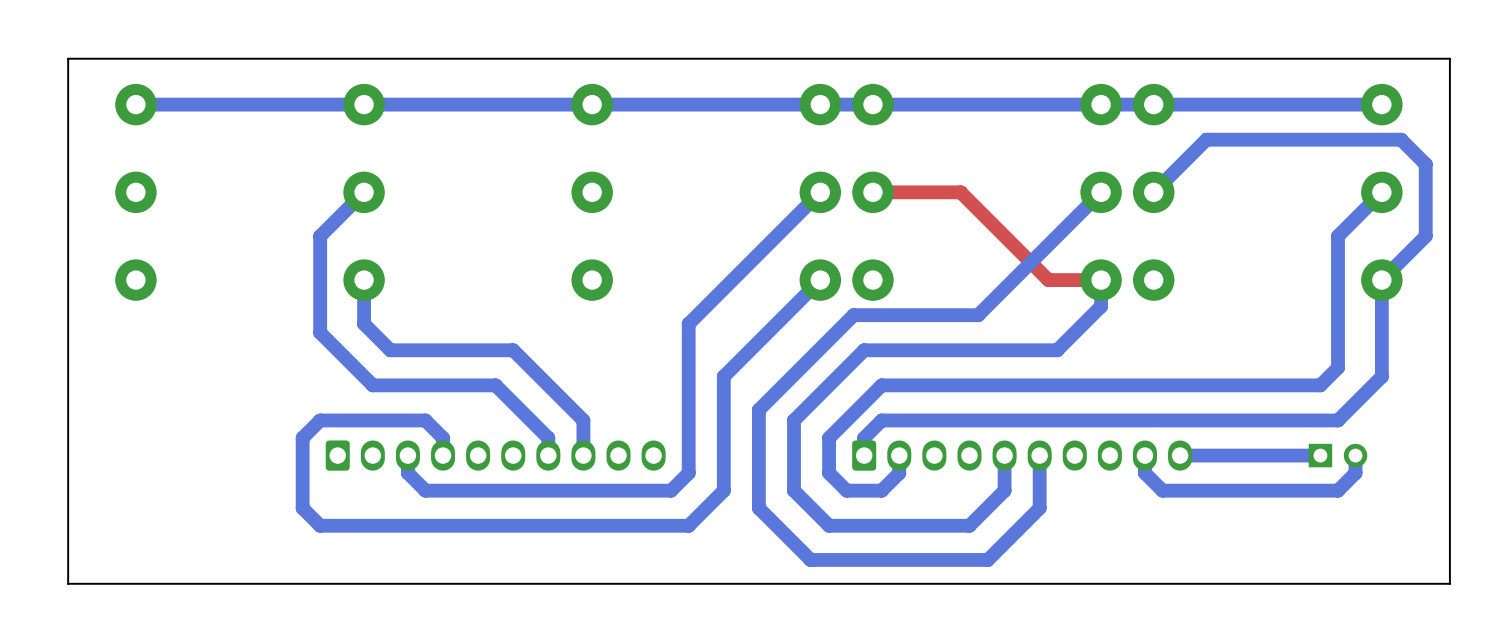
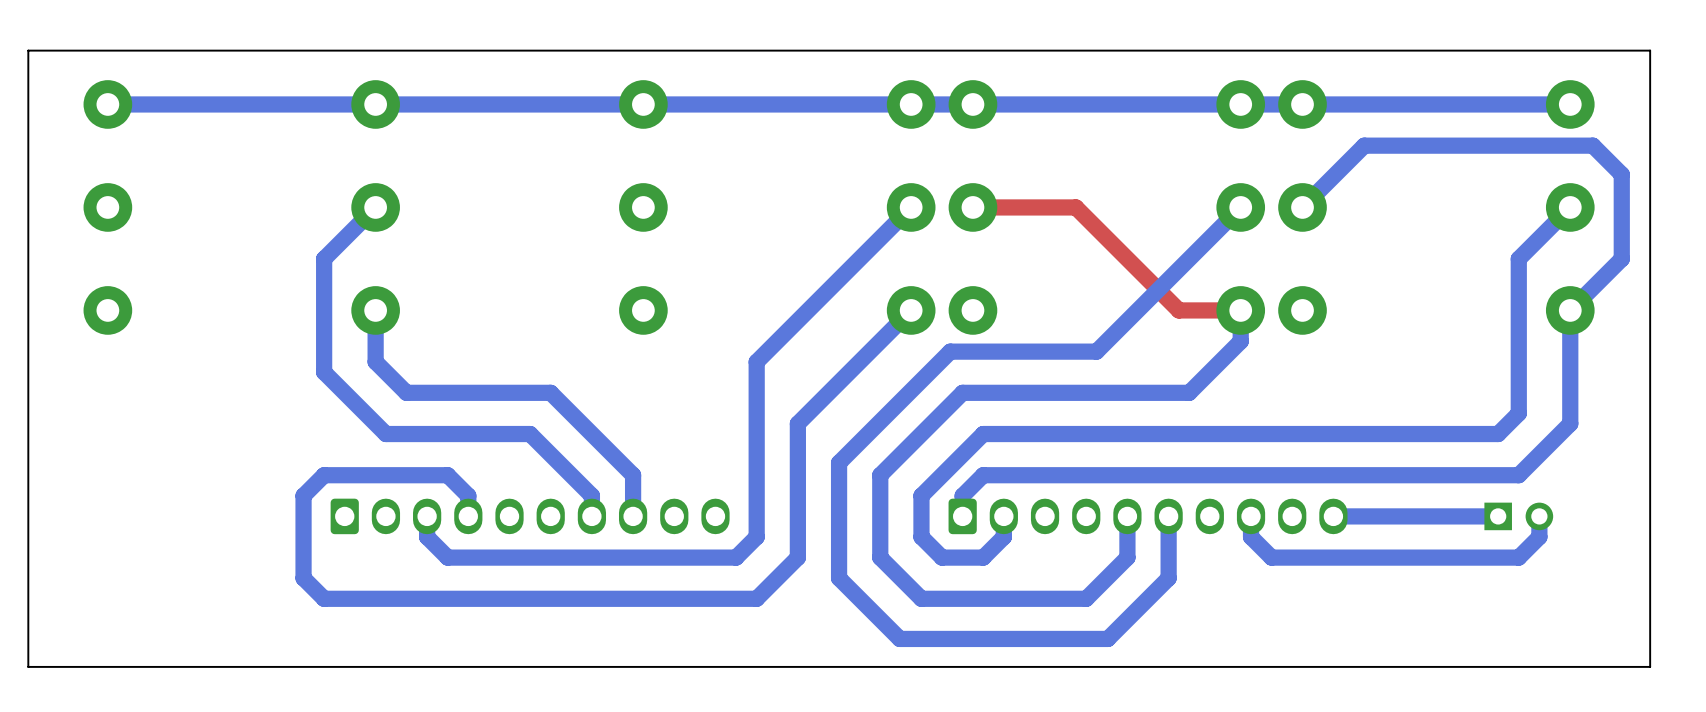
bottom track: (1144, 464) (1144, 473) (1162, 490) -> (1251, 516) (1251, 537) (1271, 557) (1312, 557)

